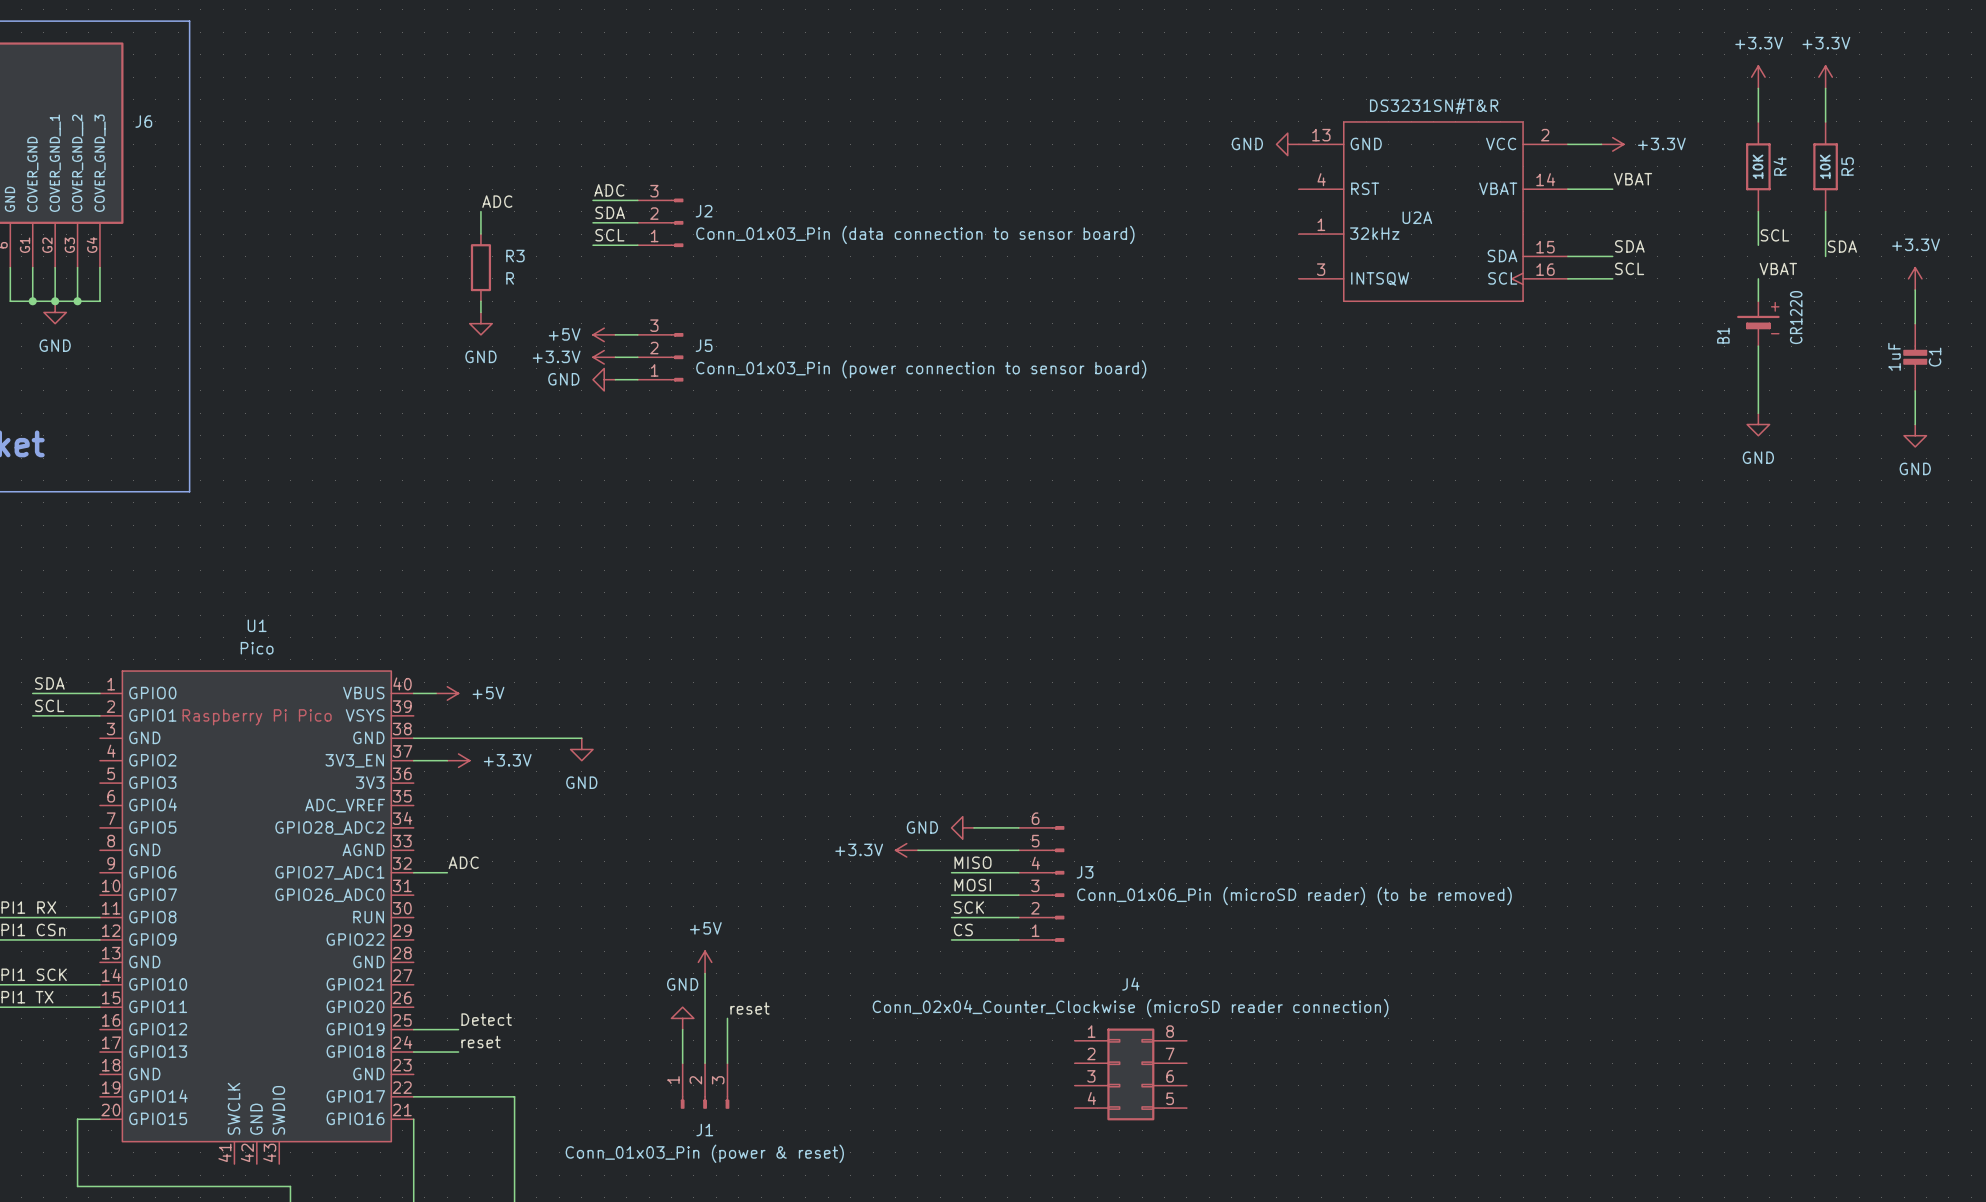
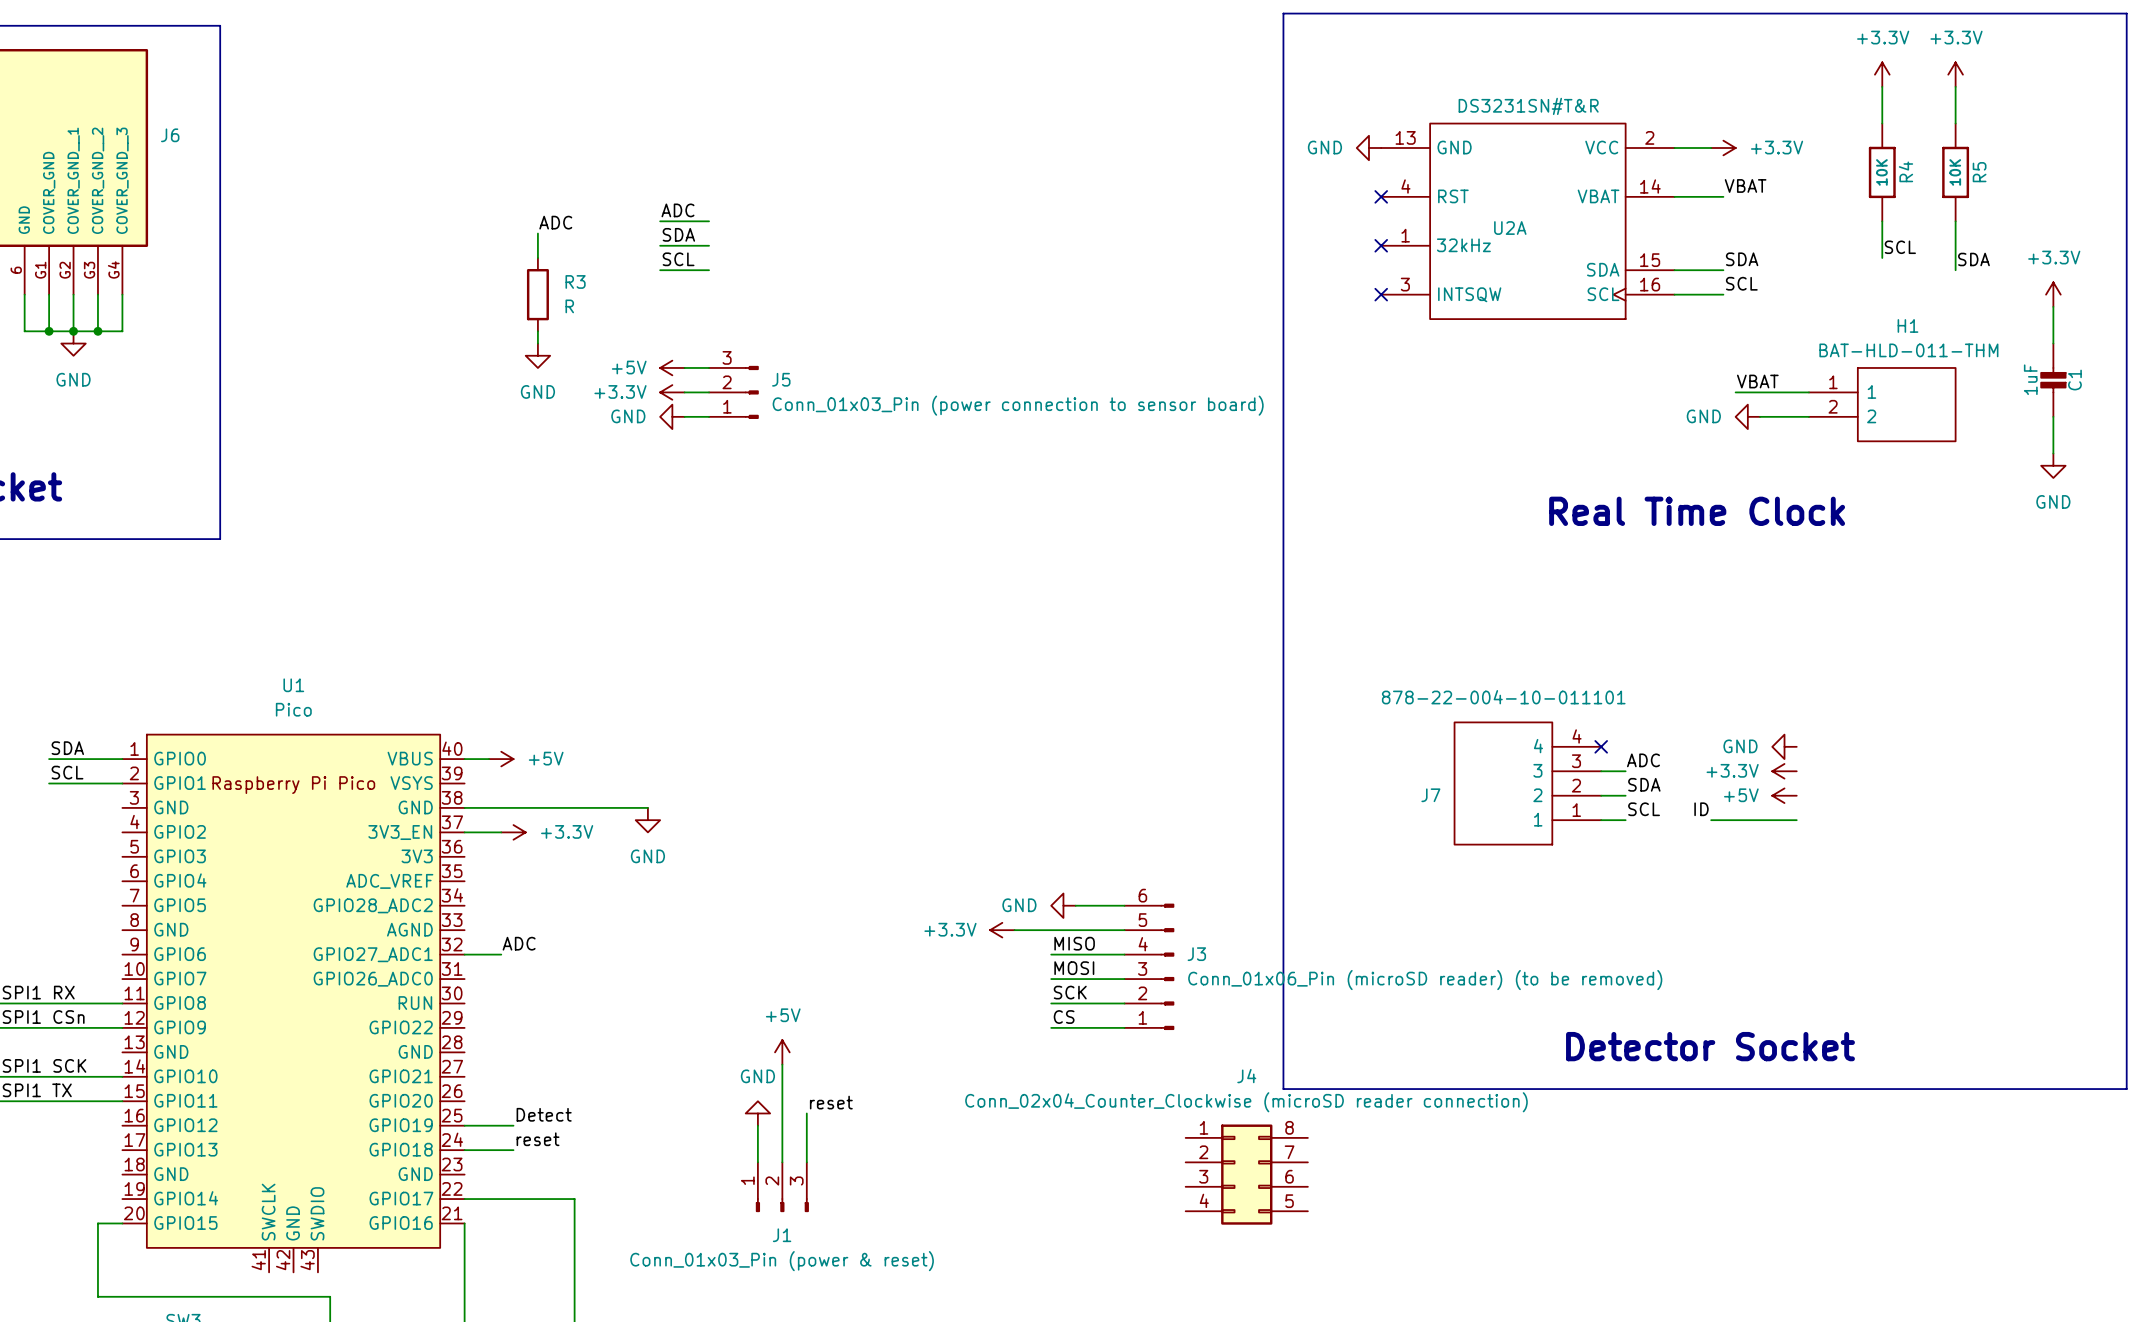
line: none -> (1283, 13) (2126, 13) (2126, 1089) (1283, 1089) (1283, 13)
power symbol: none -> +3.3V (1882, 74)
power symbol: none -> +3.3V (1955, 74)
power symbol: +3.3V (1758, 77) -> none
power symbol: +3.3V (1825, 77) -> none
wire: (1758, 88) (1758, 121) -> (1882, 86) (1882, 123)
wire: (1825, 88) (1825, 121) -> (1955, 86) (1955, 123)
power symbol position: GND (1287, 144) -> GND (1368, 148)
wire: (1567, 144) (1601, 144) -> (1674, 148) (1711, 148)
power symbol position: +3.3V (1612, 144) -> +3.3V (1723, 148)
R4 position: (1758, 166) -> (1882, 172)
R5 position: (1825, 166) -> (1955, 172)
no-connect mark: none -> (1381, 196)
label position: VBAT (1633, 179) -> VBAT (1745, 185)
wire: (1567, 189) (1612, 189) -> (1674, 196) (1723, 196)
U2A position: (1433, 211) -> (1527, 221)
wire: (1758, 211) (1758, 245) -> (1882, 221) (1882, 257)
wire: (1825, 211) (1825, 256) -> (1955, 221) (1955, 270)
J2: Conn_01x03_Pin (data connection to sensor board) (660, 222) -> none
no-connect mark: none -> (1381, 245)
label position: SCL (1774, 235) -> SCL (1900, 247)
label position: SDA (1629, 246) -> SDA (1742, 259)
label position: SDA (1842, 246) -> SDA (1973, 259)
wire: (1567, 256) (1612, 256) -> (1674, 270) (1723, 270)
no-connect mark: none -> (1381, 294)
label position: SCL (1629, 268) -> SCL (1741, 283)
label: VBAT (1778, 269) -> none
wire: (1567, 278) (1612, 278) -> (1674, 294) (1723, 294)
wire: (1758, 278) (1758, 301) -> none
power symbol position: +3.3V (1915, 278) -> +3.3V (2053, 294)
wire: (1915, 290) (1915, 323) -> (2053, 306) (2053, 343)
B1: CR1220 (1758, 323) -> none
wire: (1758, 346) (1758, 413) -> none
label: none -> VBAT (1757, 381)
wire: none -> (1735, 392) (1808, 392)
C1 position: (1915, 357) -> (2053, 380)
H1: none -> BAT-HLD-011-THM (1882, 404)
power symbol: none -> GND (1747, 416)
wire: none -> (1760, 416) (1808, 416)
wire: (1915, 390) (1915, 424) -> (2053, 416) (2053, 453)
power symbol: GND (1758, 424) -> none
power symbol position: GND (1915, 435) -> GND (2053, 465)
text: none -> Real Time Clock (1697, 511)
no-connect mark: none -> (1601, 746)
power symbol: none -> GND (1784, 746)
label: none -> ADC (1643, 760)
wire: none -> (1601, 771) (1625, 771)
power symbol: none -> +3.3V (1784, 771)
J7: none -> 878-22-004-10-011101 (1527, 783)
label: none -> SDA (1644, 784)
wire: none -> (1601, 795) (1625, 795)
power symbol: none -> +5V (1784, 795)
label: none -> SCL (1644, 809)
label: none -> ID (1701, 809)
wire: none -> (1601, 820) (1625, 820)
wire: none -> (1711, 820) (1796, 820)
text: none -> Detector Socket (1710, 1046)

